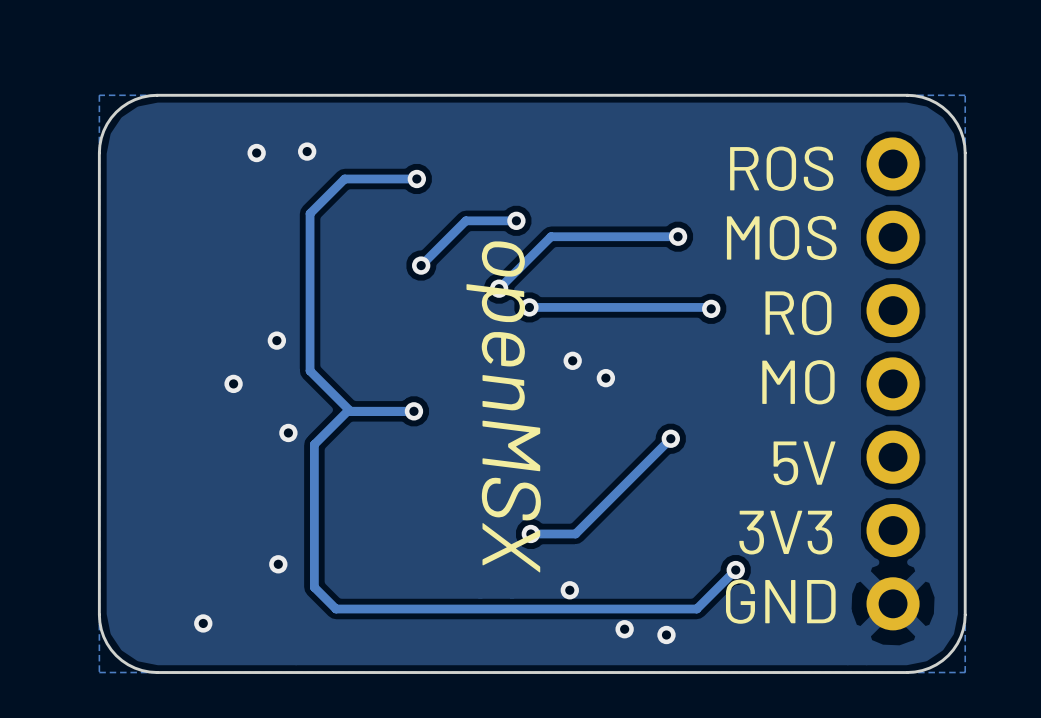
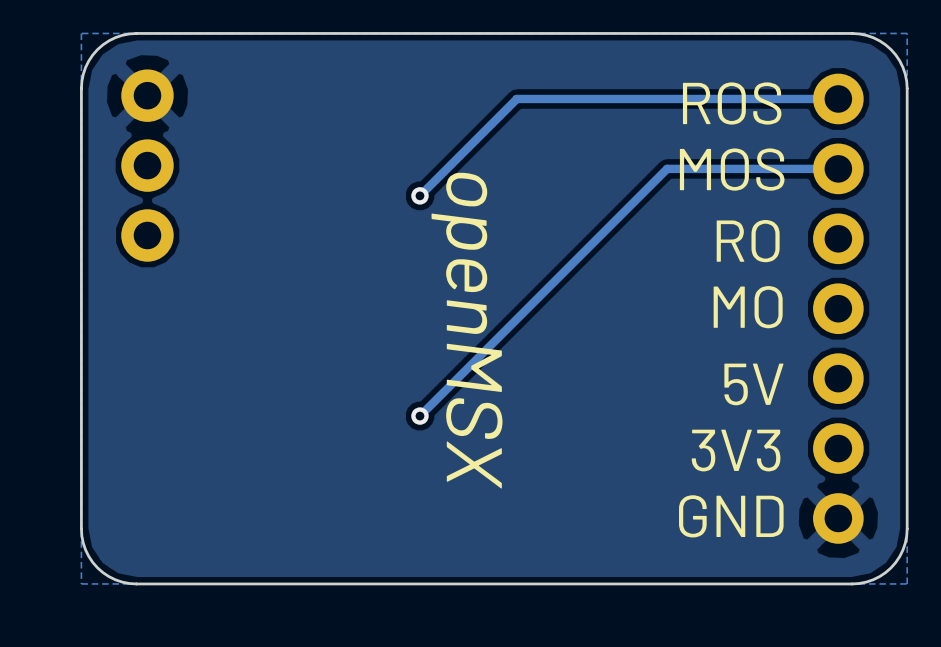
via: (307, 151) -> none
via: (256, 153) -> none
track: none -> (838, 98) (516, 98) (419, 195)
track: (416, 178) (344, 178) (310, 213) (310, 370) (350, 411) -> none
via: (416, 178) -> none
track: (516, 220) (465, 220) (421, 265) -> none
via: (516, 220) -> none
part: none -> (147, 165)
track: (678, 236) (551, 236) (499, 288) -> none
via: (678, 236) -> none
track: none -> (838, 168) (667, 168) (419, 416)
via: (421, 265) -> none
via: none -> (419, 195)
via: (499, 288) -> none
track: (529, 307) (711, 308) -> none
via: (529, 307) -> none
via: (711, 308) -> none
via: (276, 340) -> none
via: (572, 360) -> none
via: (605, 378) -> none
via: (233, 383) -> none
track: (413, 411) (347, 411) (314, 444) (314, 587) (336, 609) (696, 609) (735, 570) -> none
via: (413, 411) -> none
via: (288, 432) -> none
track: (670, 438) (575, 533) (530, 533) -> none
via: (670, 438) -> none
via: none -> (419, 416)
via: (530, 533) -> none
via: (278, 564) -> none
via: (735, 570) -> none
via: (569, 590) -> none
via: (203, 623) -> none
via: (624, 629) -> none
via: (666, 635) -> none

